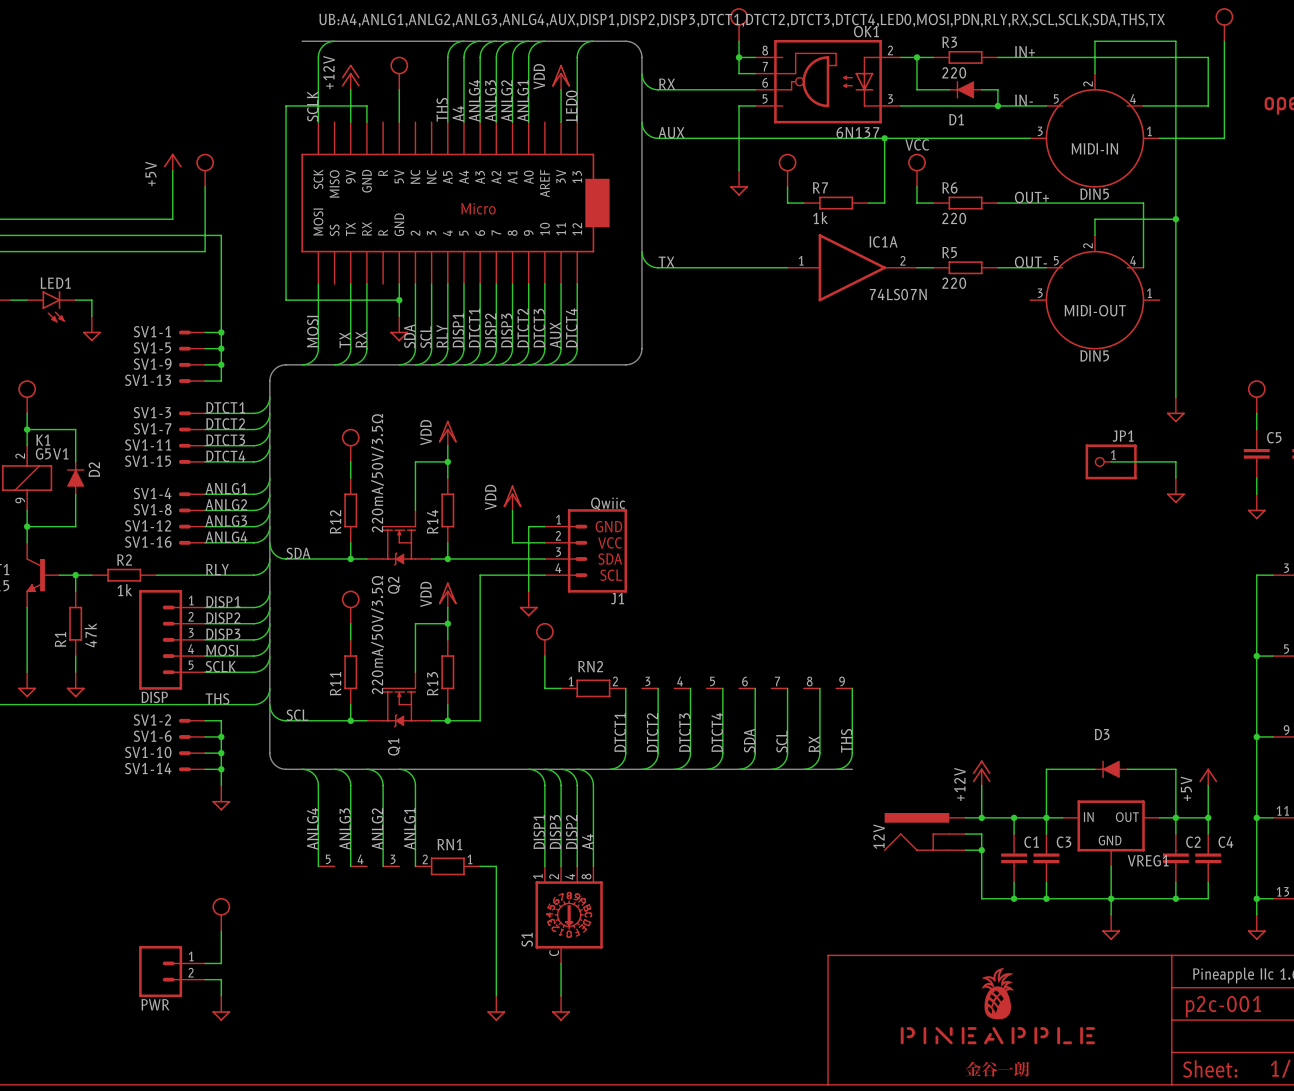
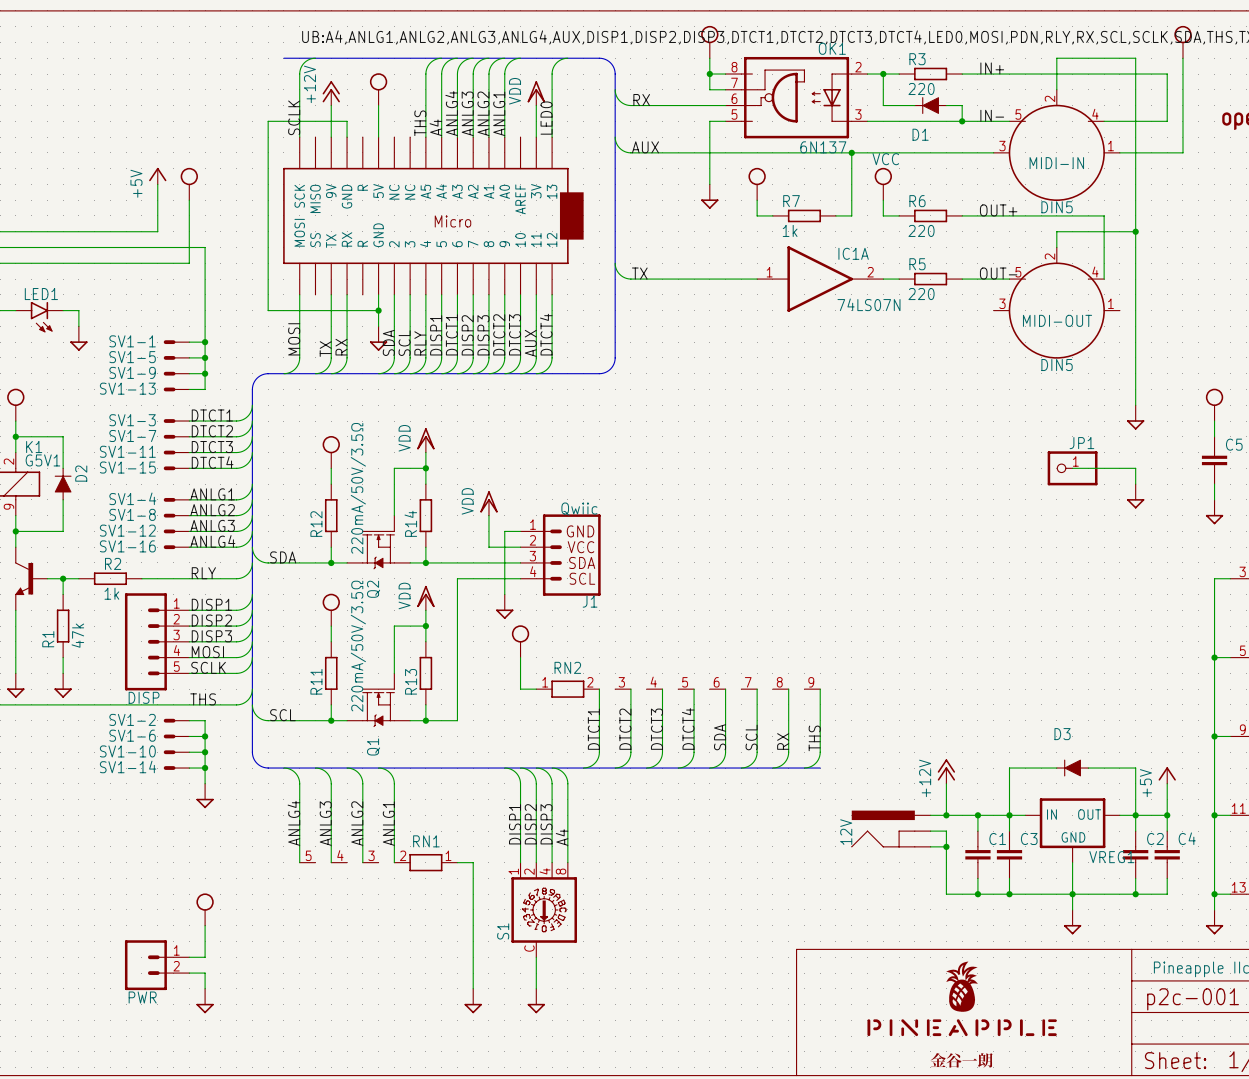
label: DISP3 (555, 832) -> DISP2 (530, 824)
label: DISP2 (571, 832) -> DISP3 (546, 824)

